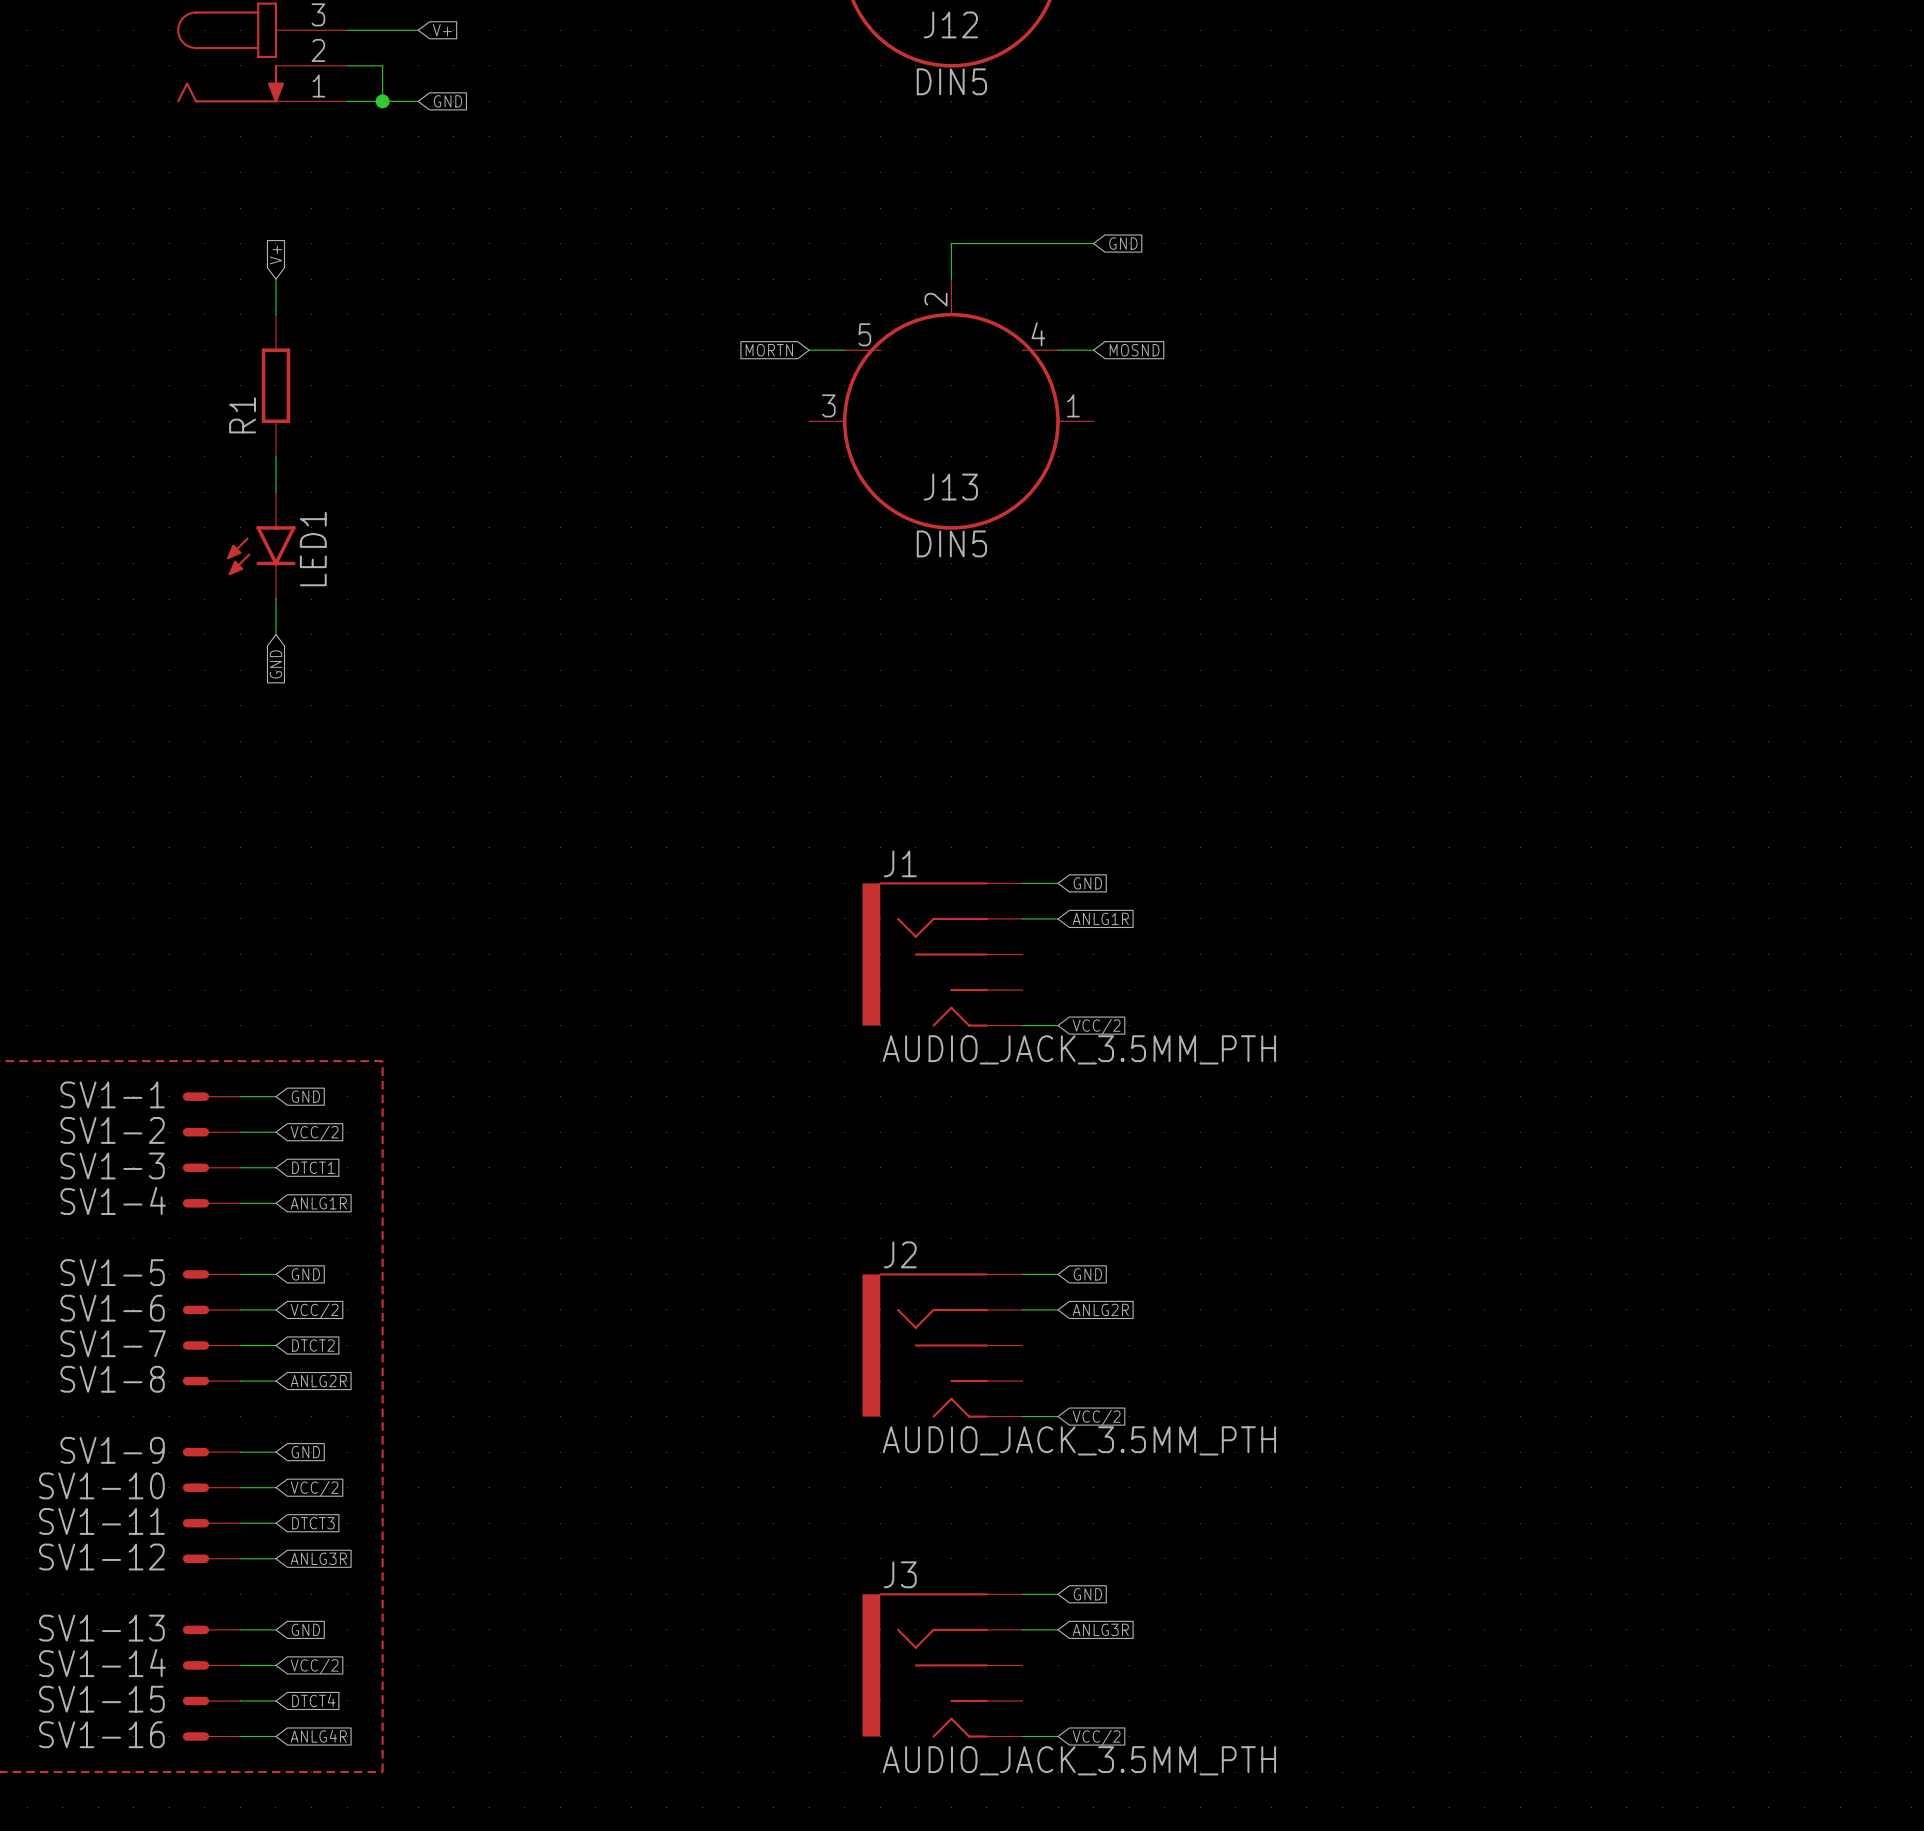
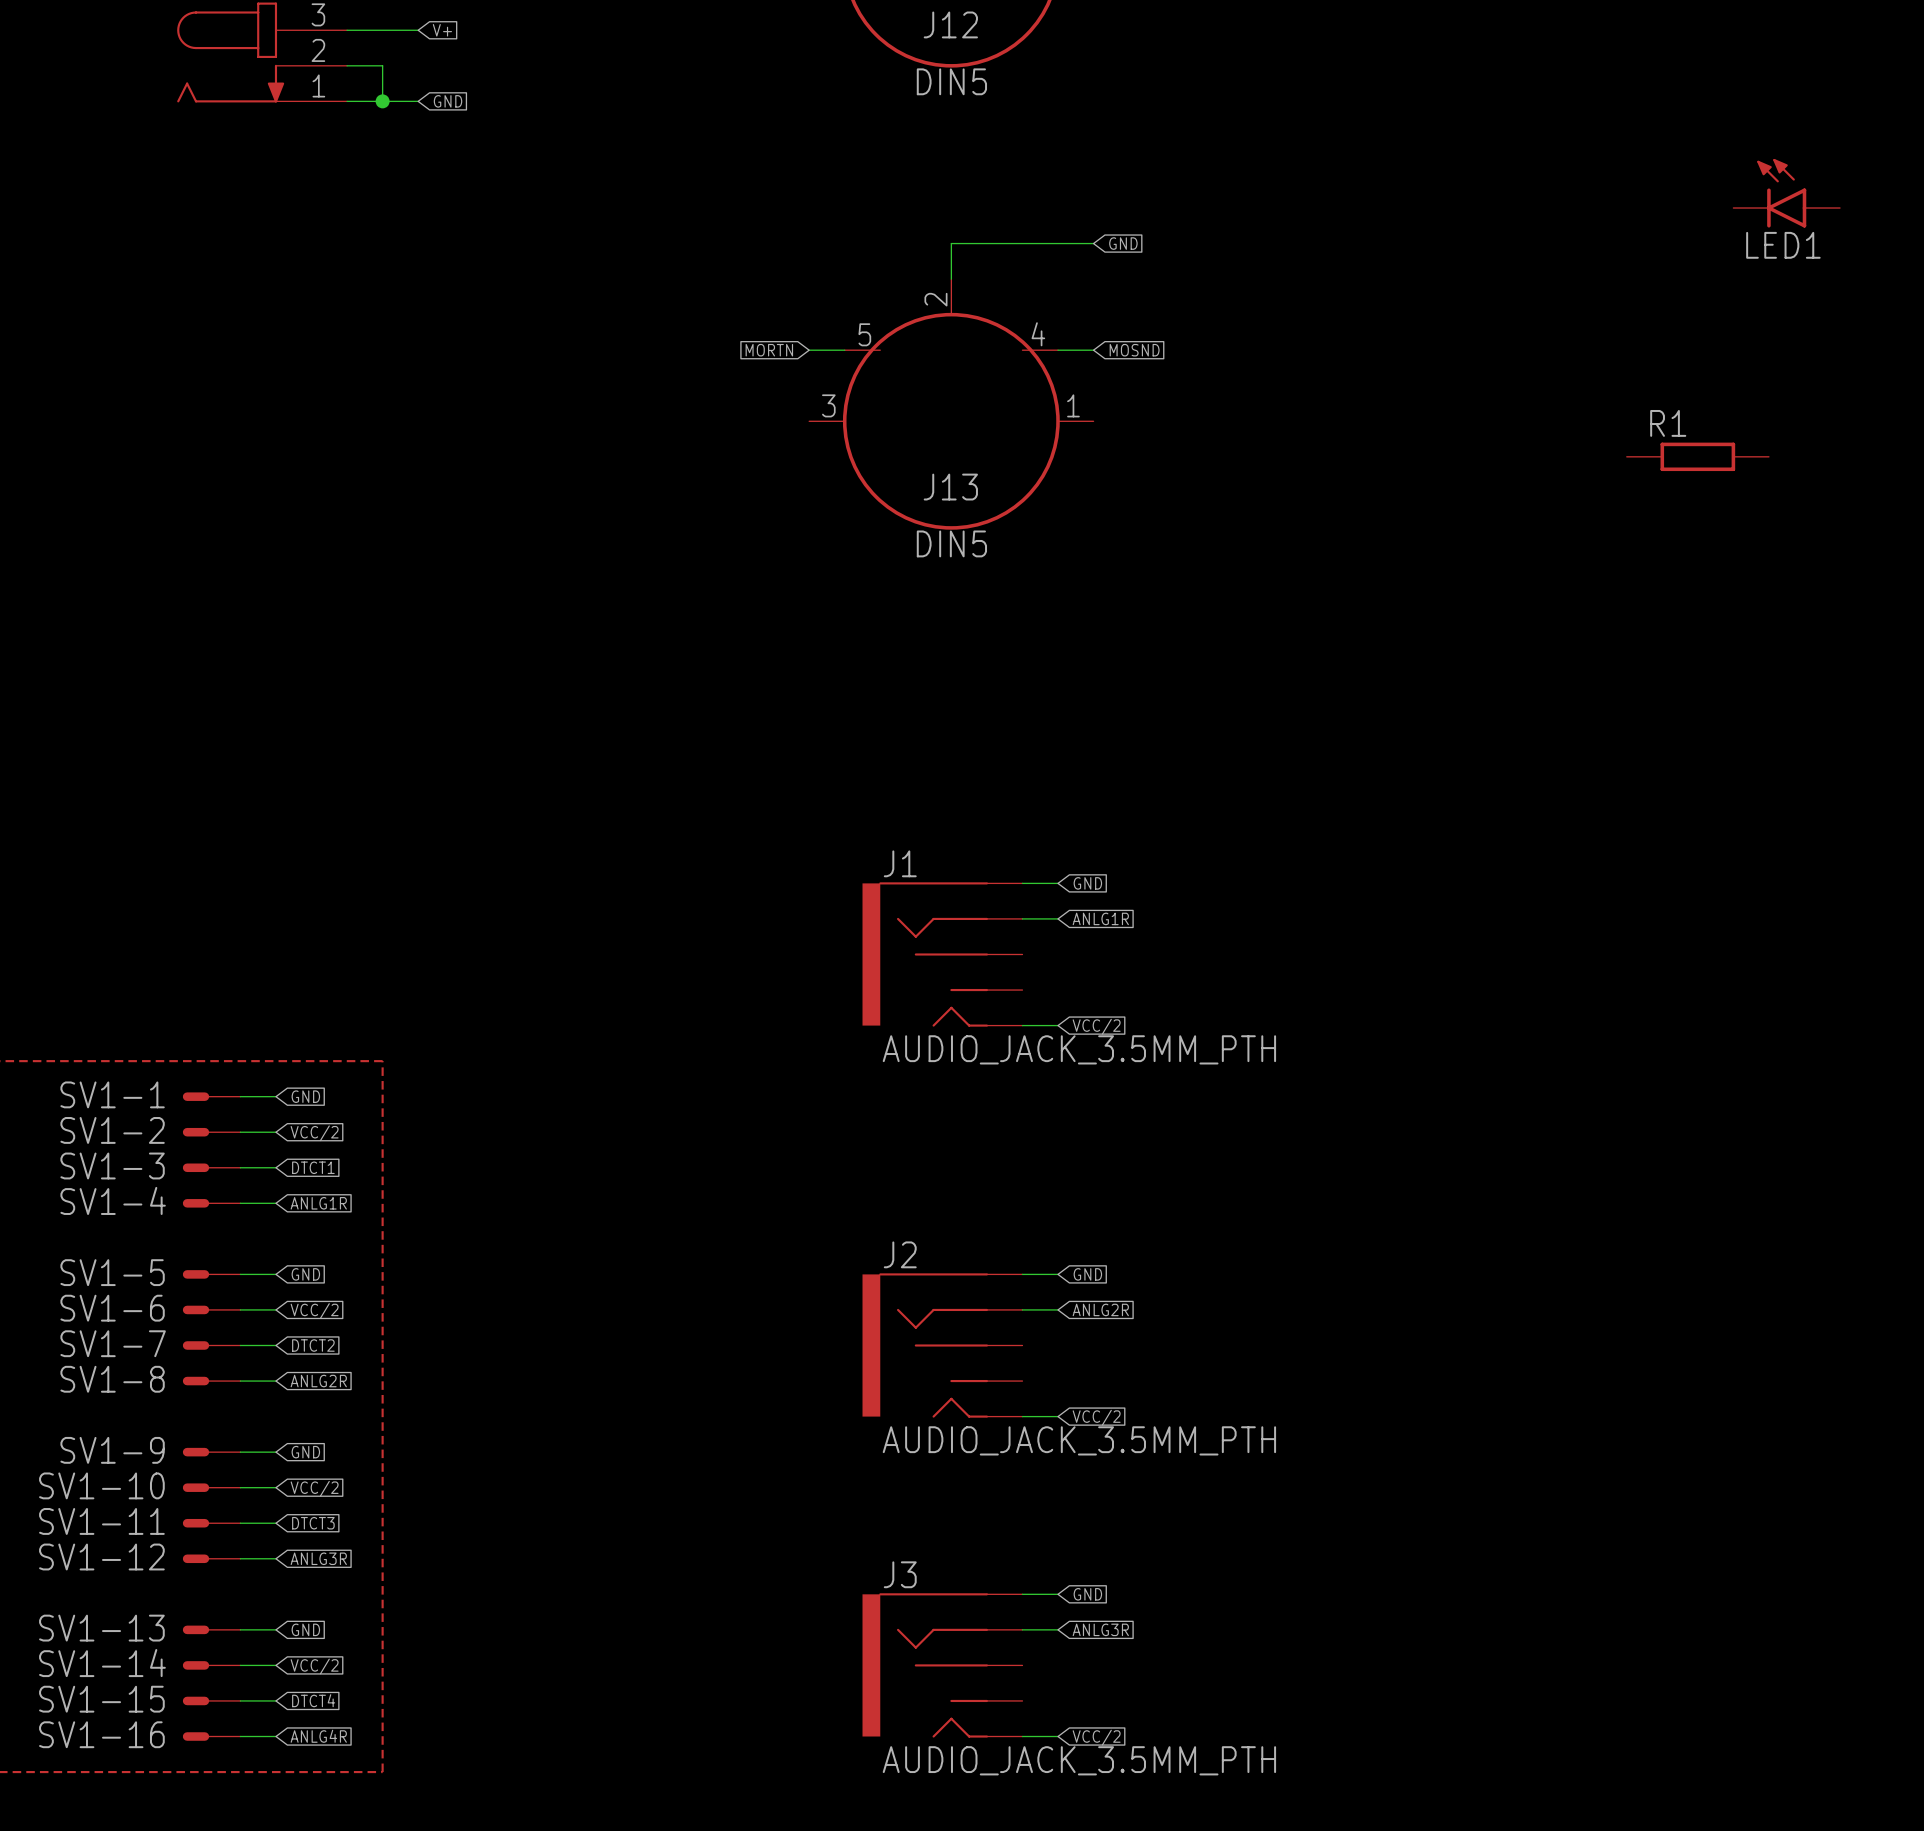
global label: V+ (275, 254) -> none
wire: (275, 279) (275, 314) -> none
R1 rotation: 0° (275, 385) -> 90° clockwise (1697, 456)
R1 position: (275, 385) -> (1697, 456)
wire: (275, 456) (275, 492) -> none
LED1 position: (261, 545) -> (1786, 193)
LED1 rotation: 0° (261, 550) -> 90° clockwise (1781, 193)
wire: (275, 599) (275, 634) -> none
global label: GND (275, 664) -> none

